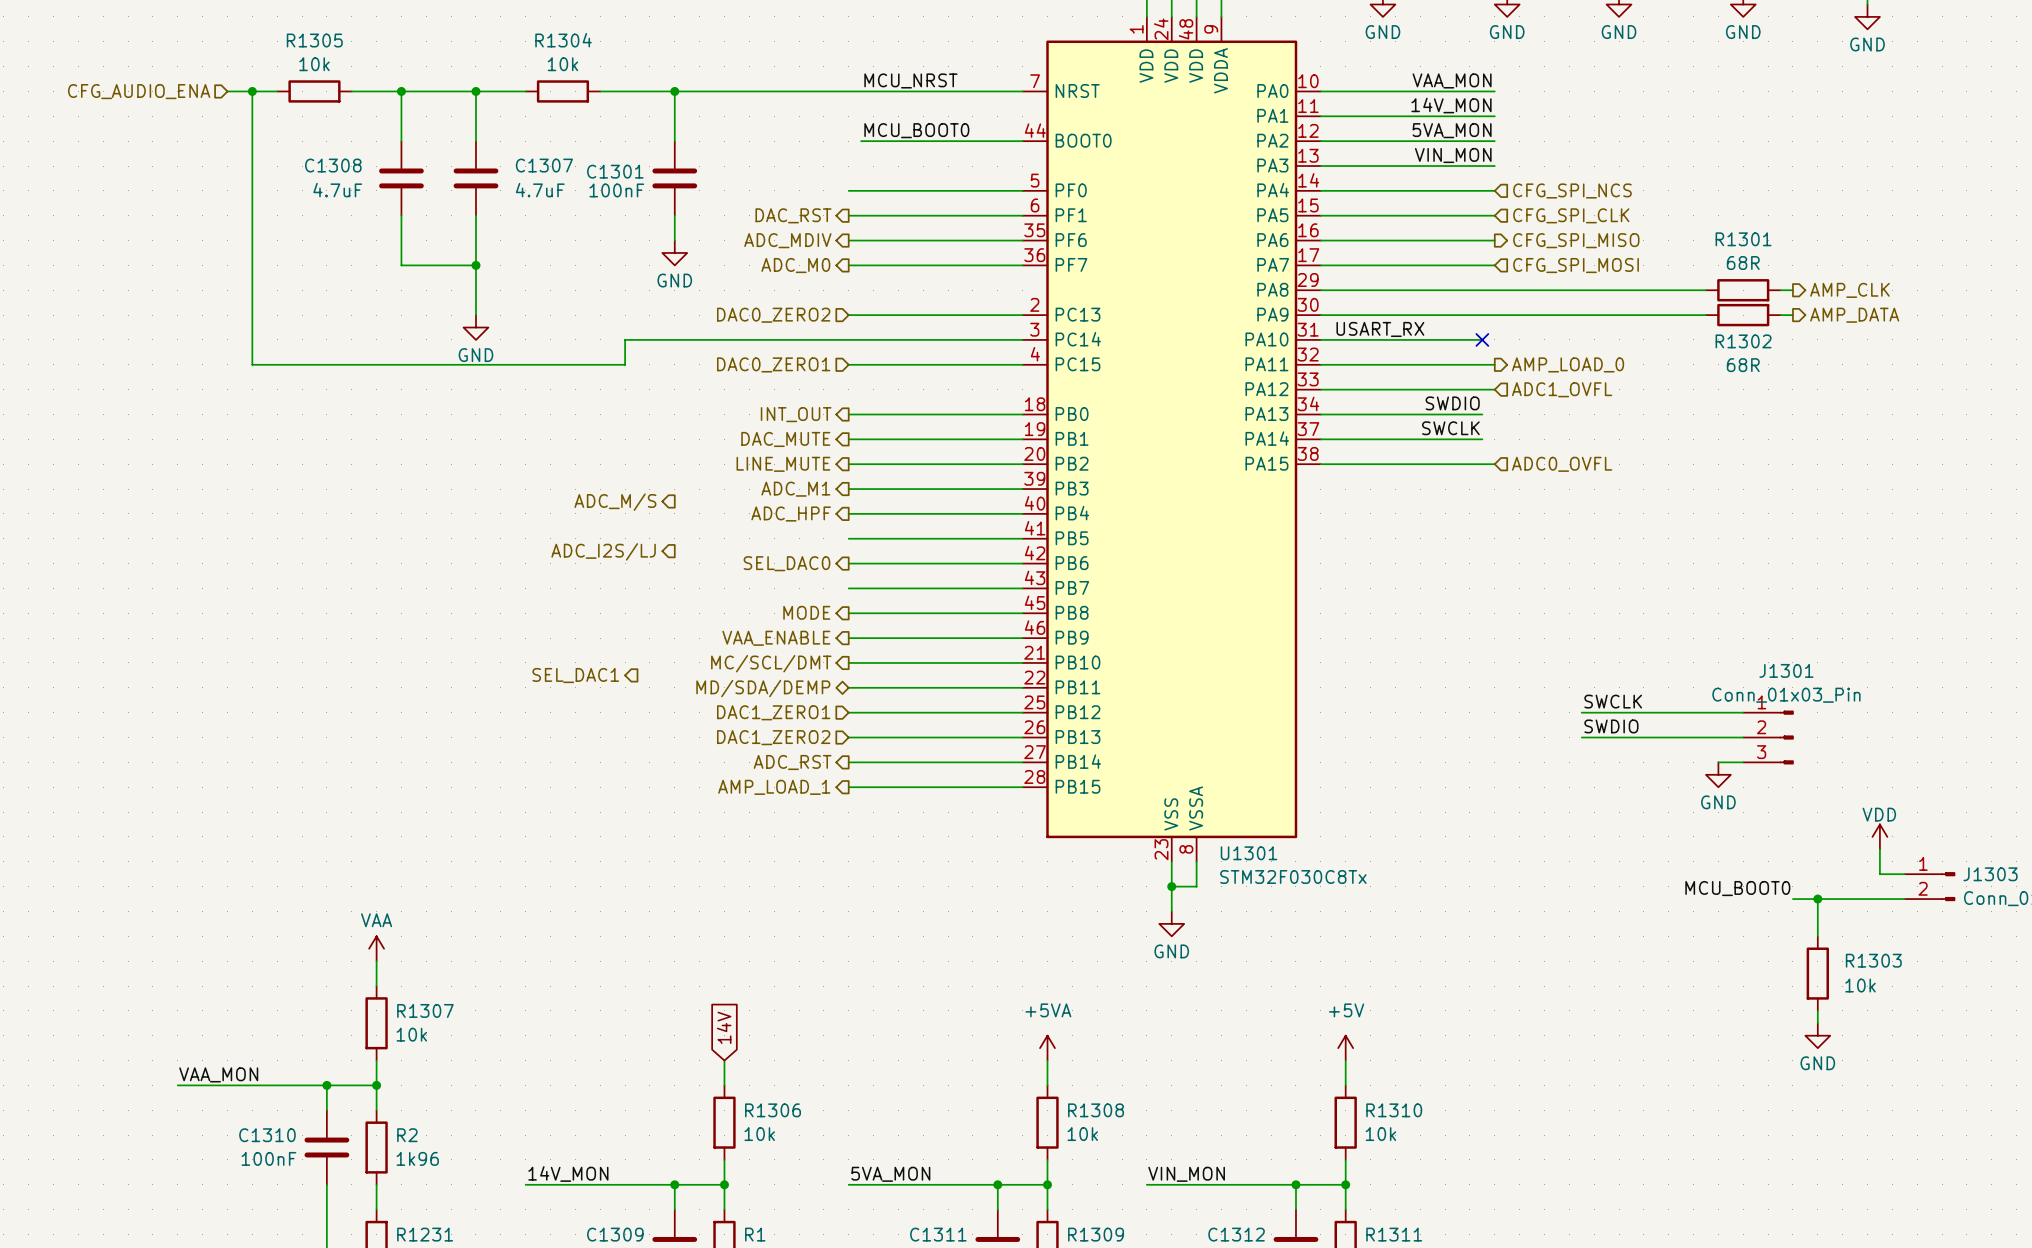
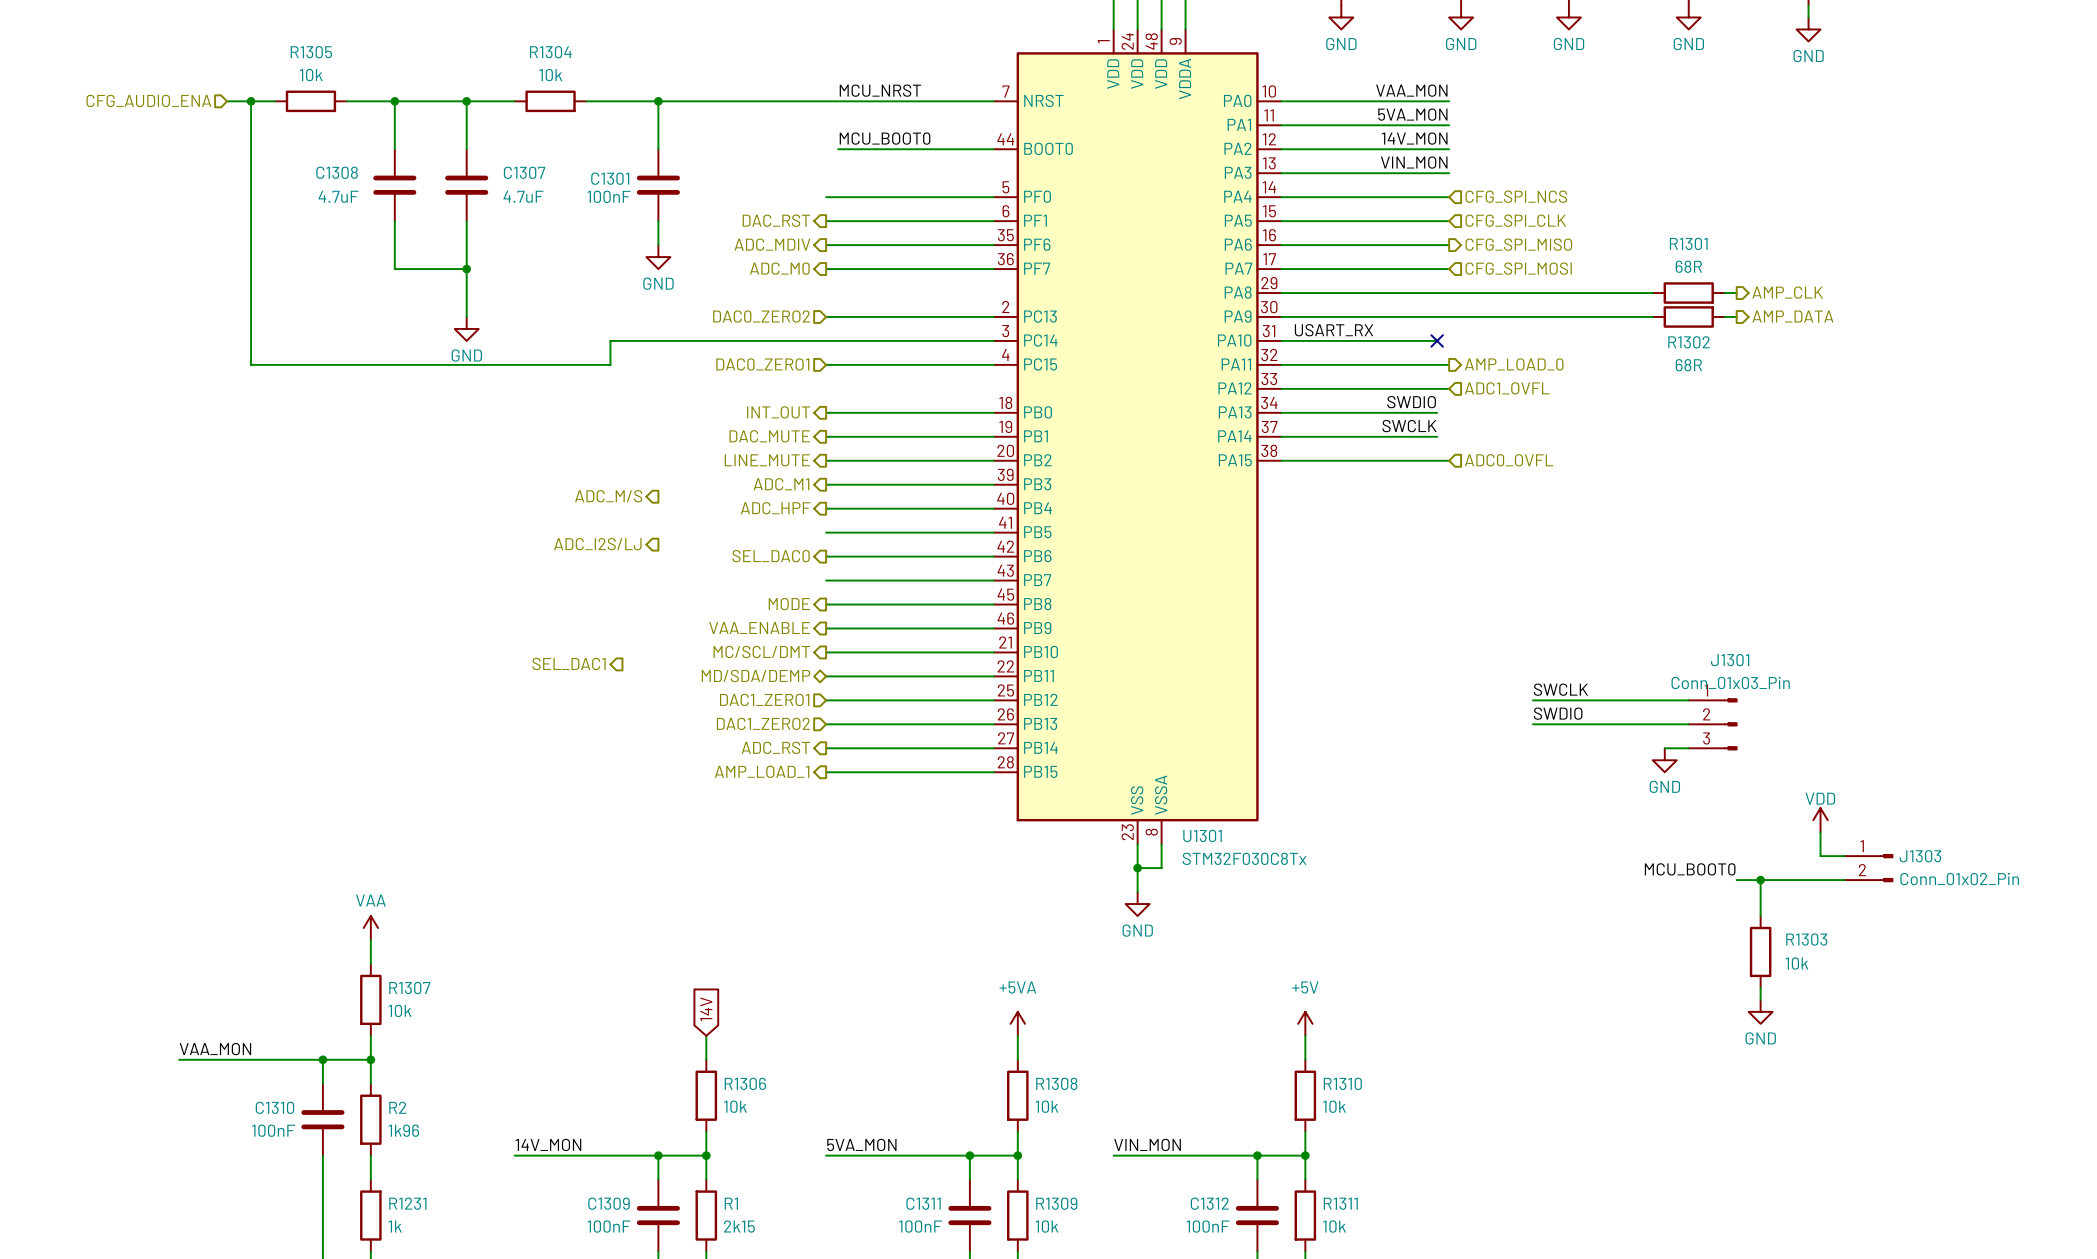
label: 14V_MON (1451, 105) -> 5VA_MON (1412, 114)
label: 5VA_MON (1452, 130) -> 14V_MON (1414, 138)

